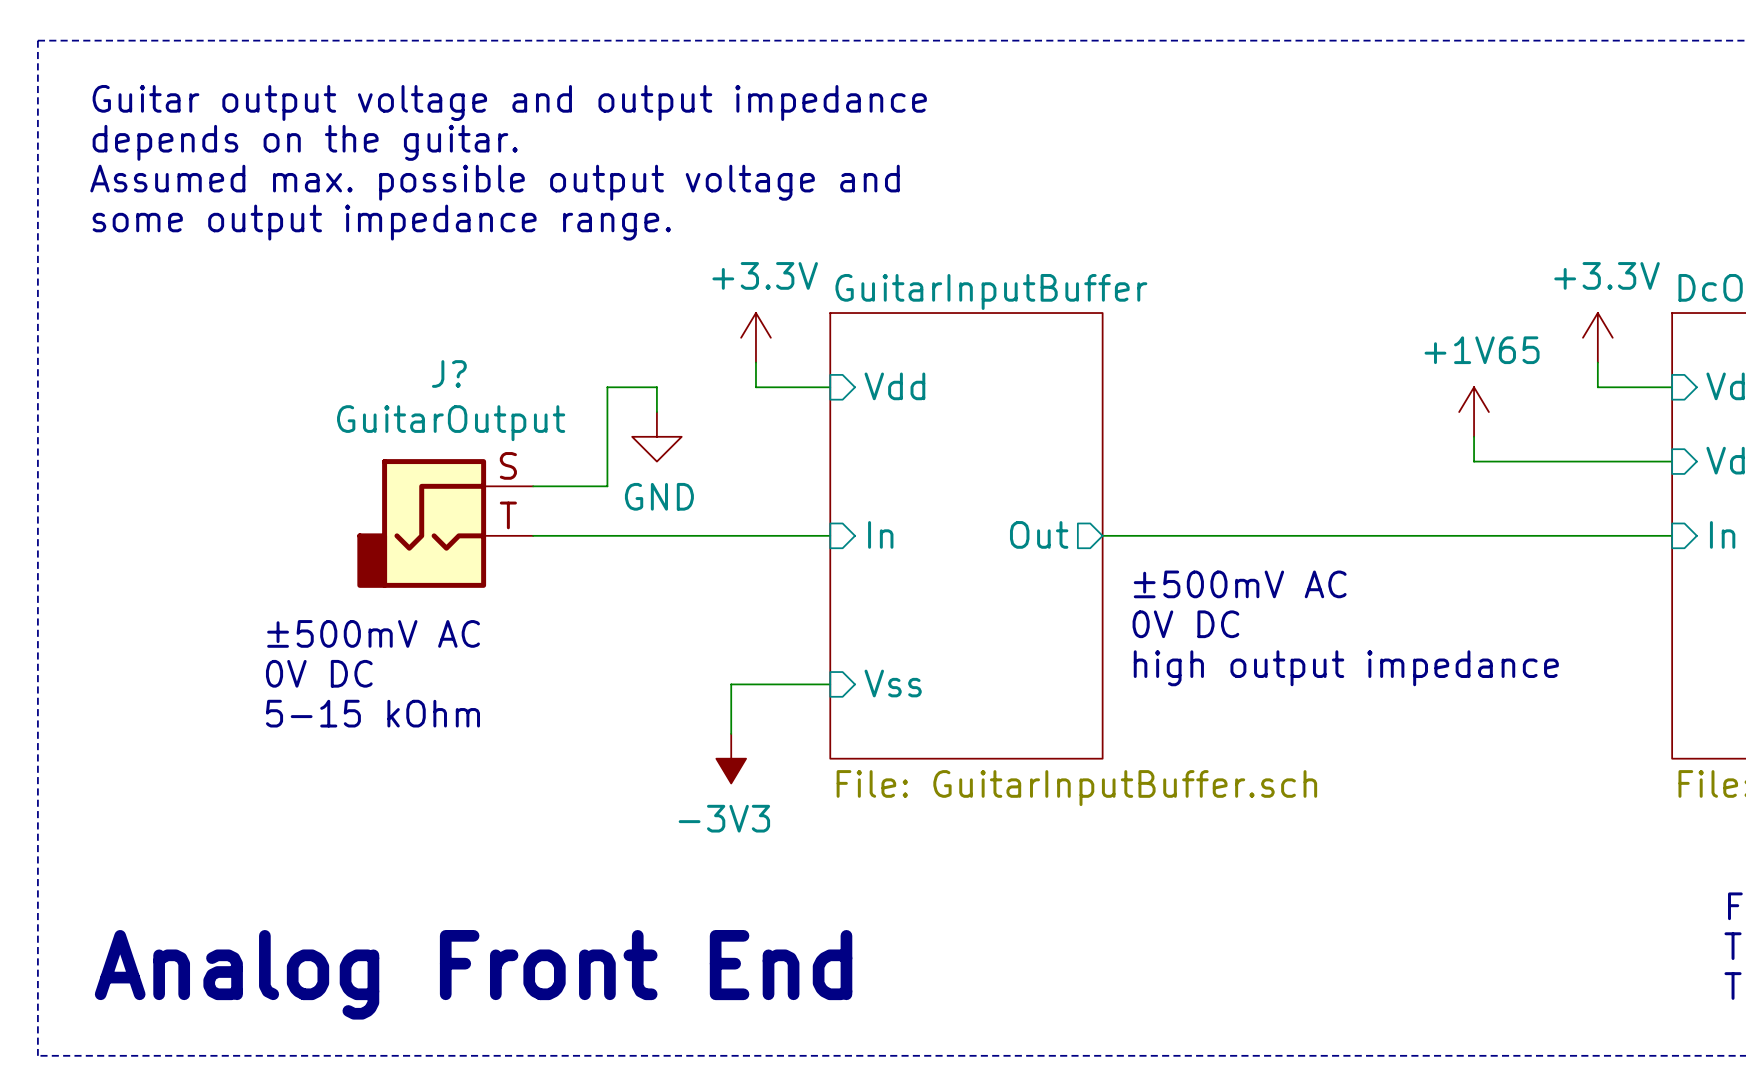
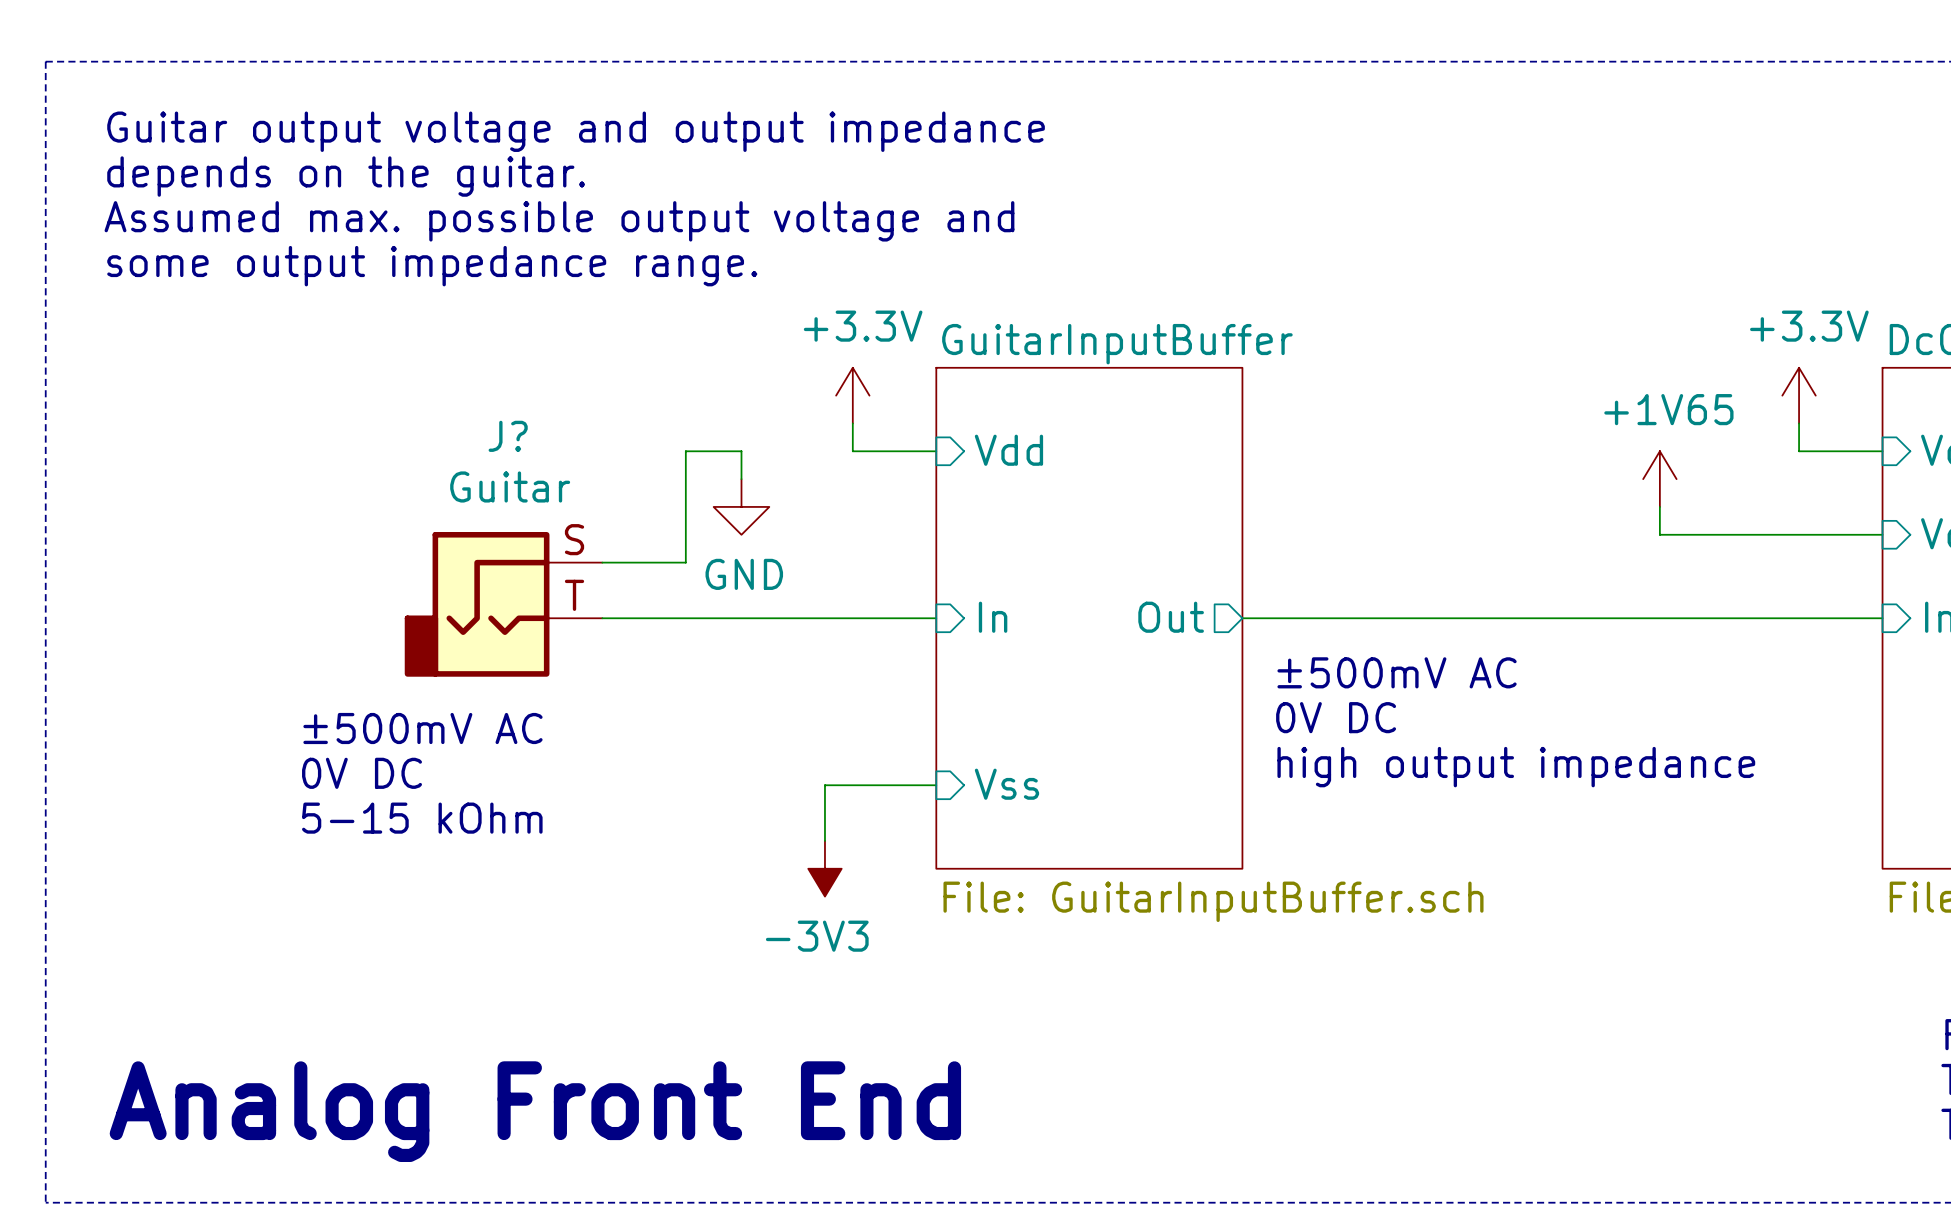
J? value: GuitarOutput (451, 423) -> Guitar (510, 486)

